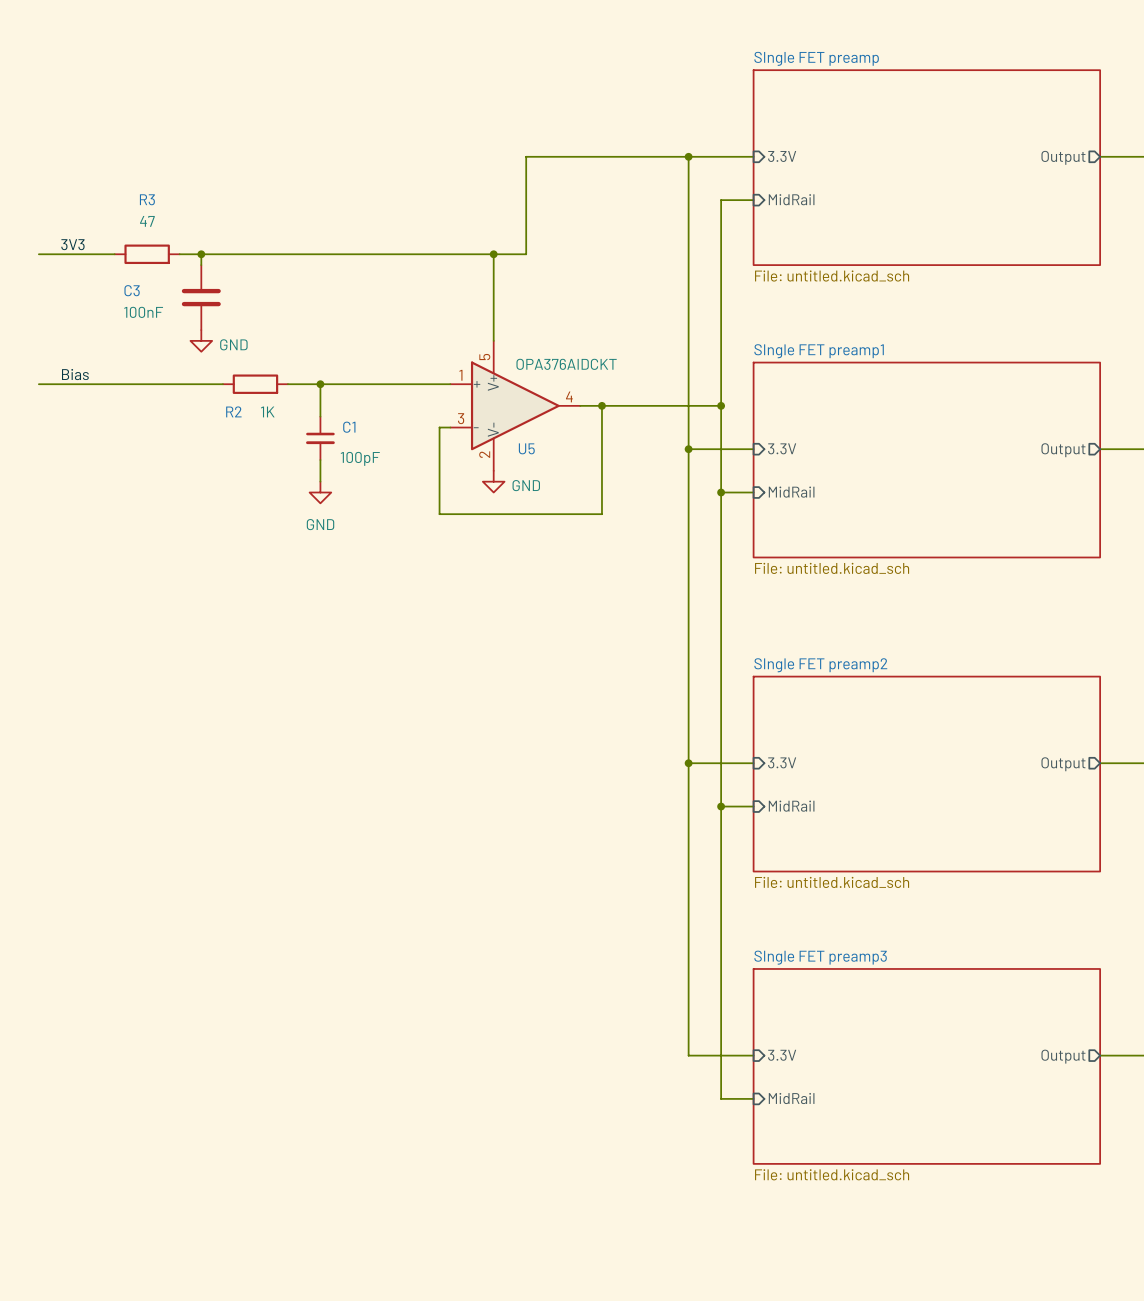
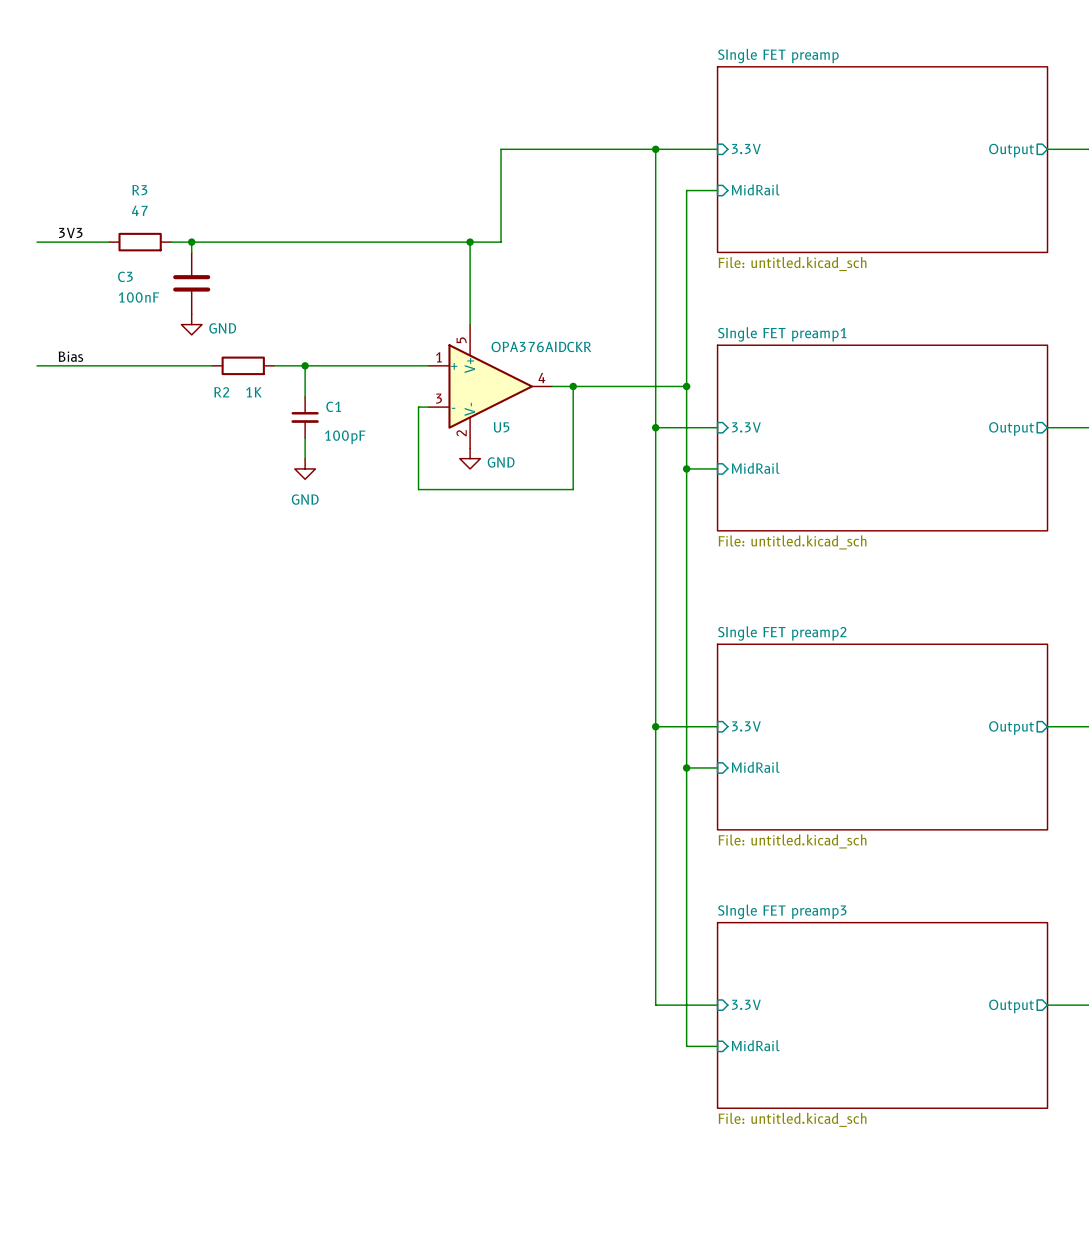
U5 value: OPA376AIDCKT (566, 364) -> OPA376AIDCKR (541, 346)

